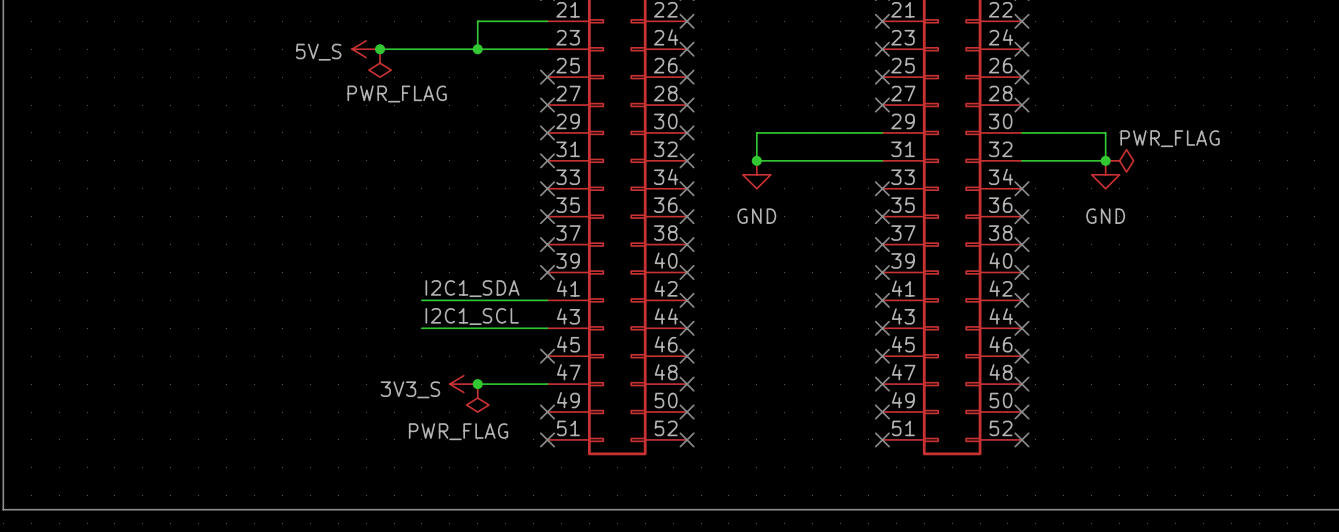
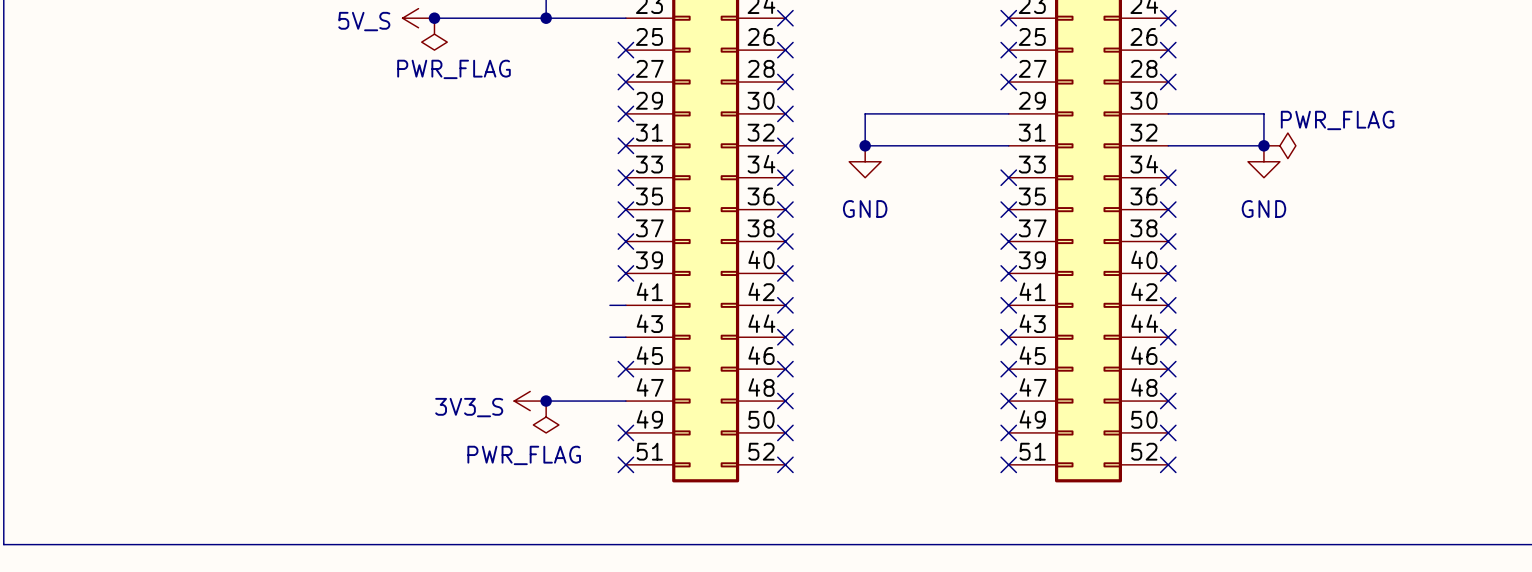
label: I2C1_SDA (472, 288) -> none
wire: (421, 300) (533, 300) -> none
label: I2C1_SCL (472, 316) -> none
wire: (421, 328) (533, 328) -> none

